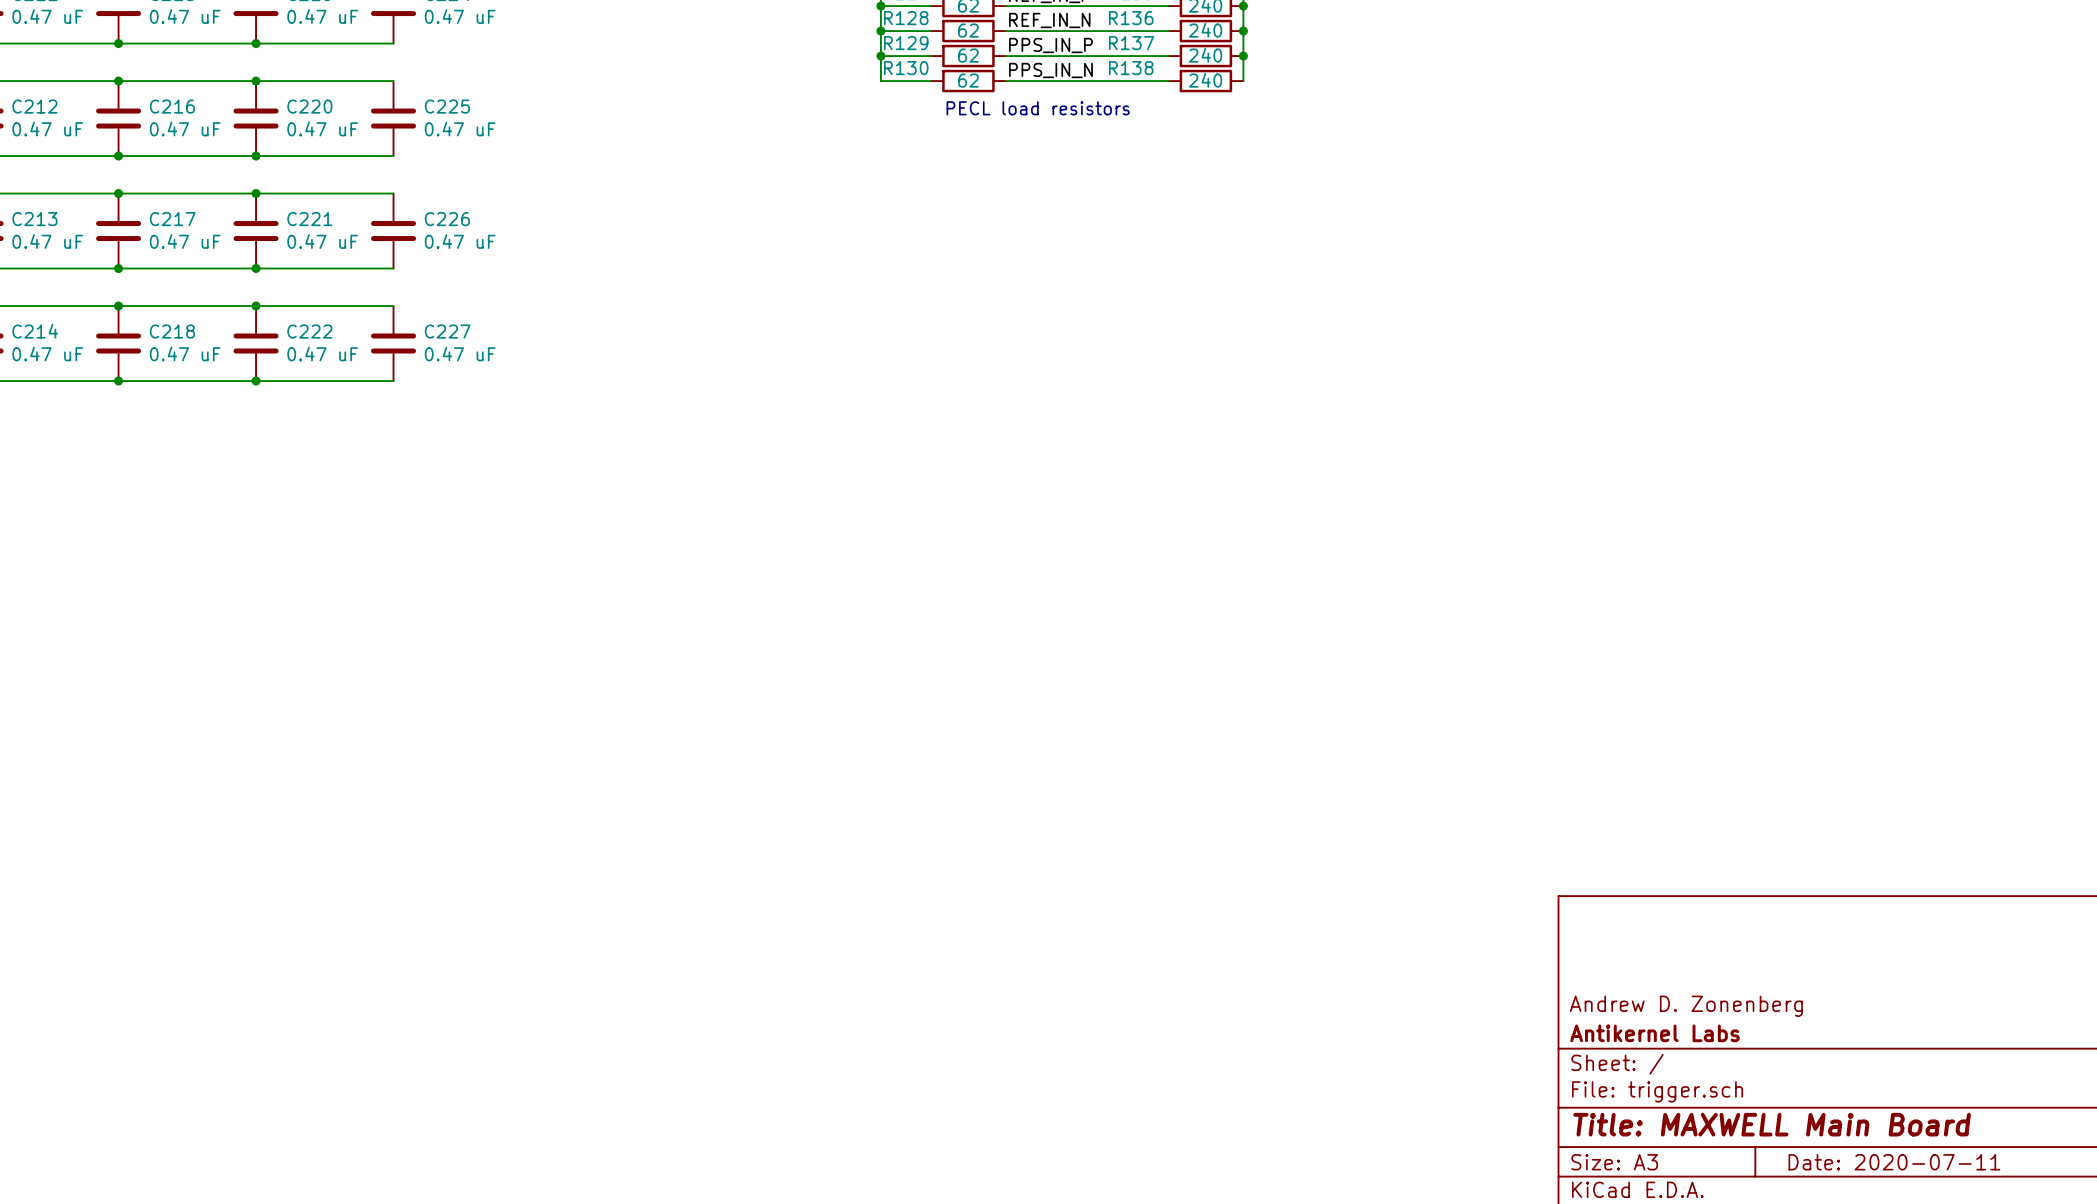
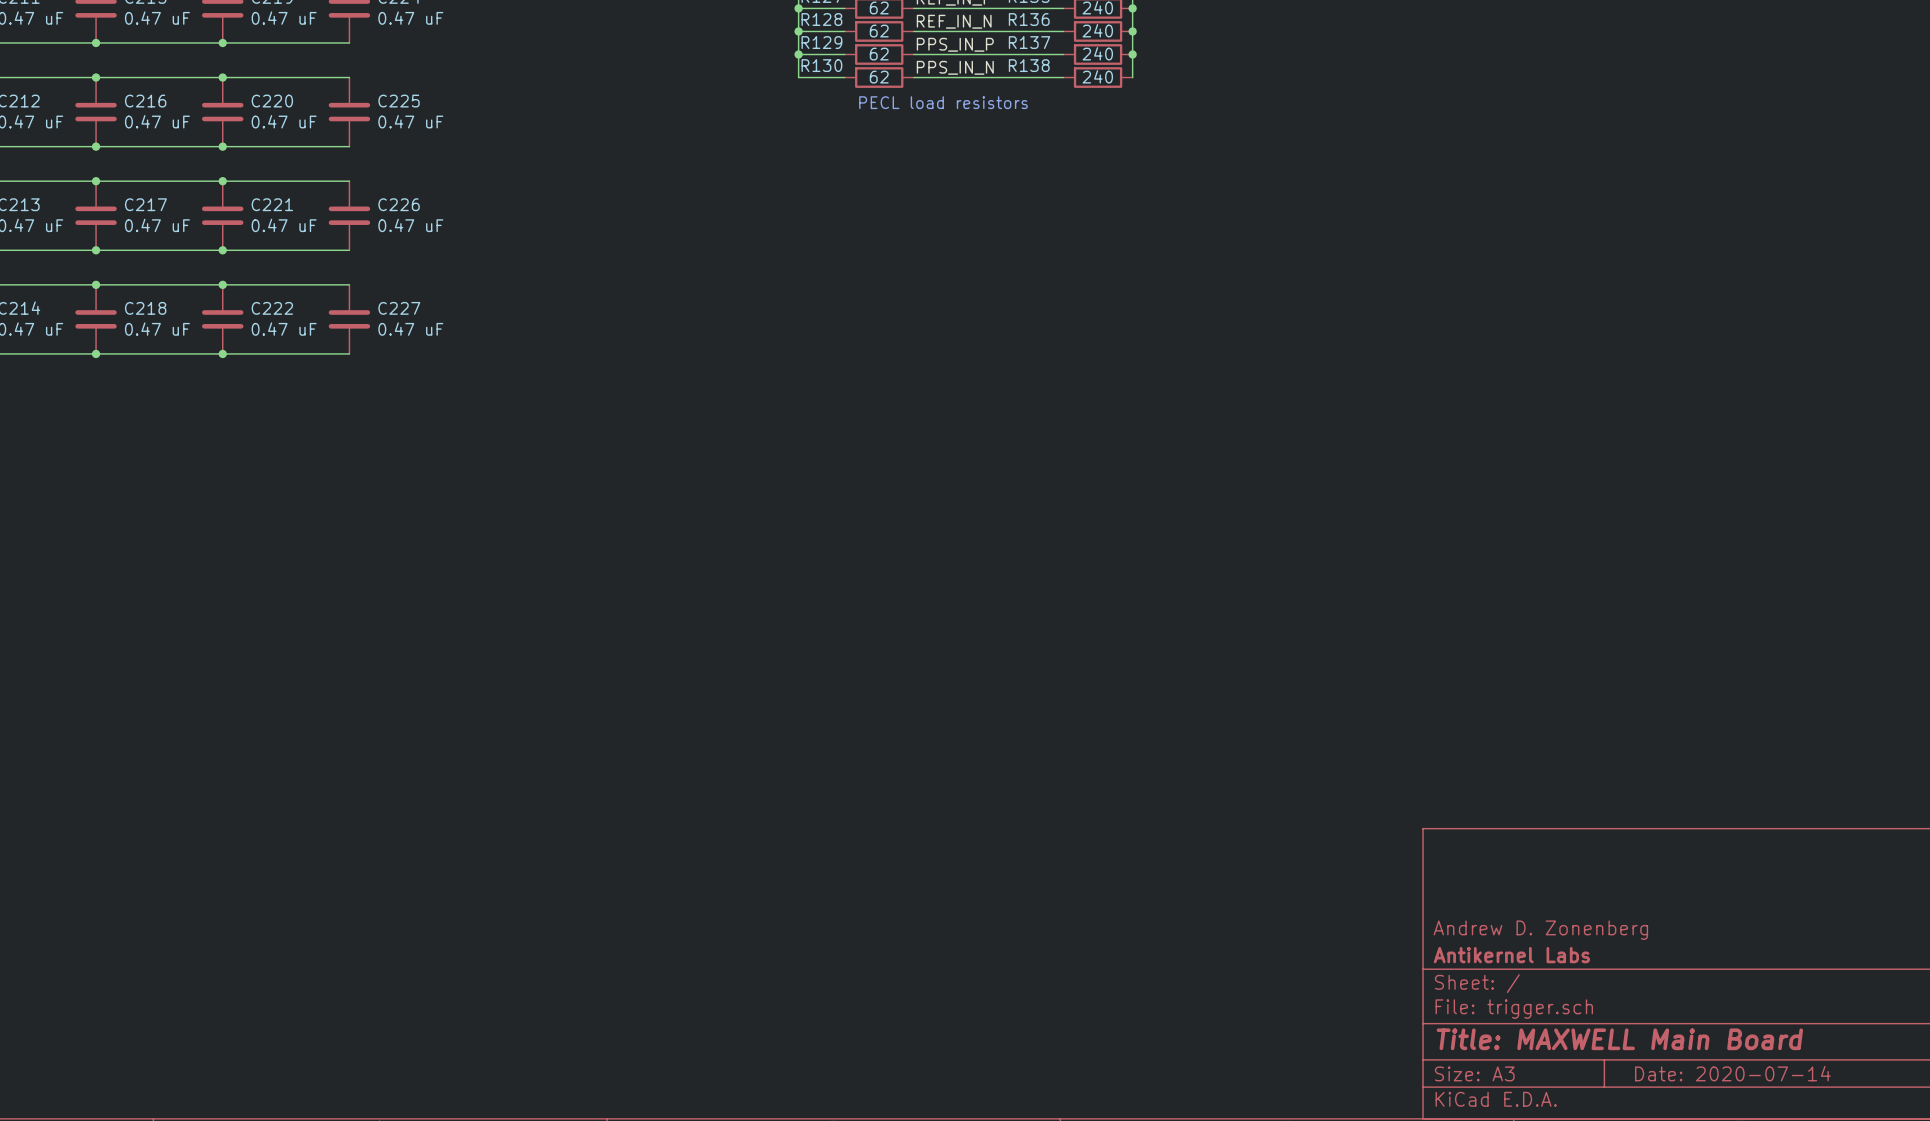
title block: Date: 2020-07-11 (1894, 1162) -> Date: 2020-07-14 (1732, 1073)

